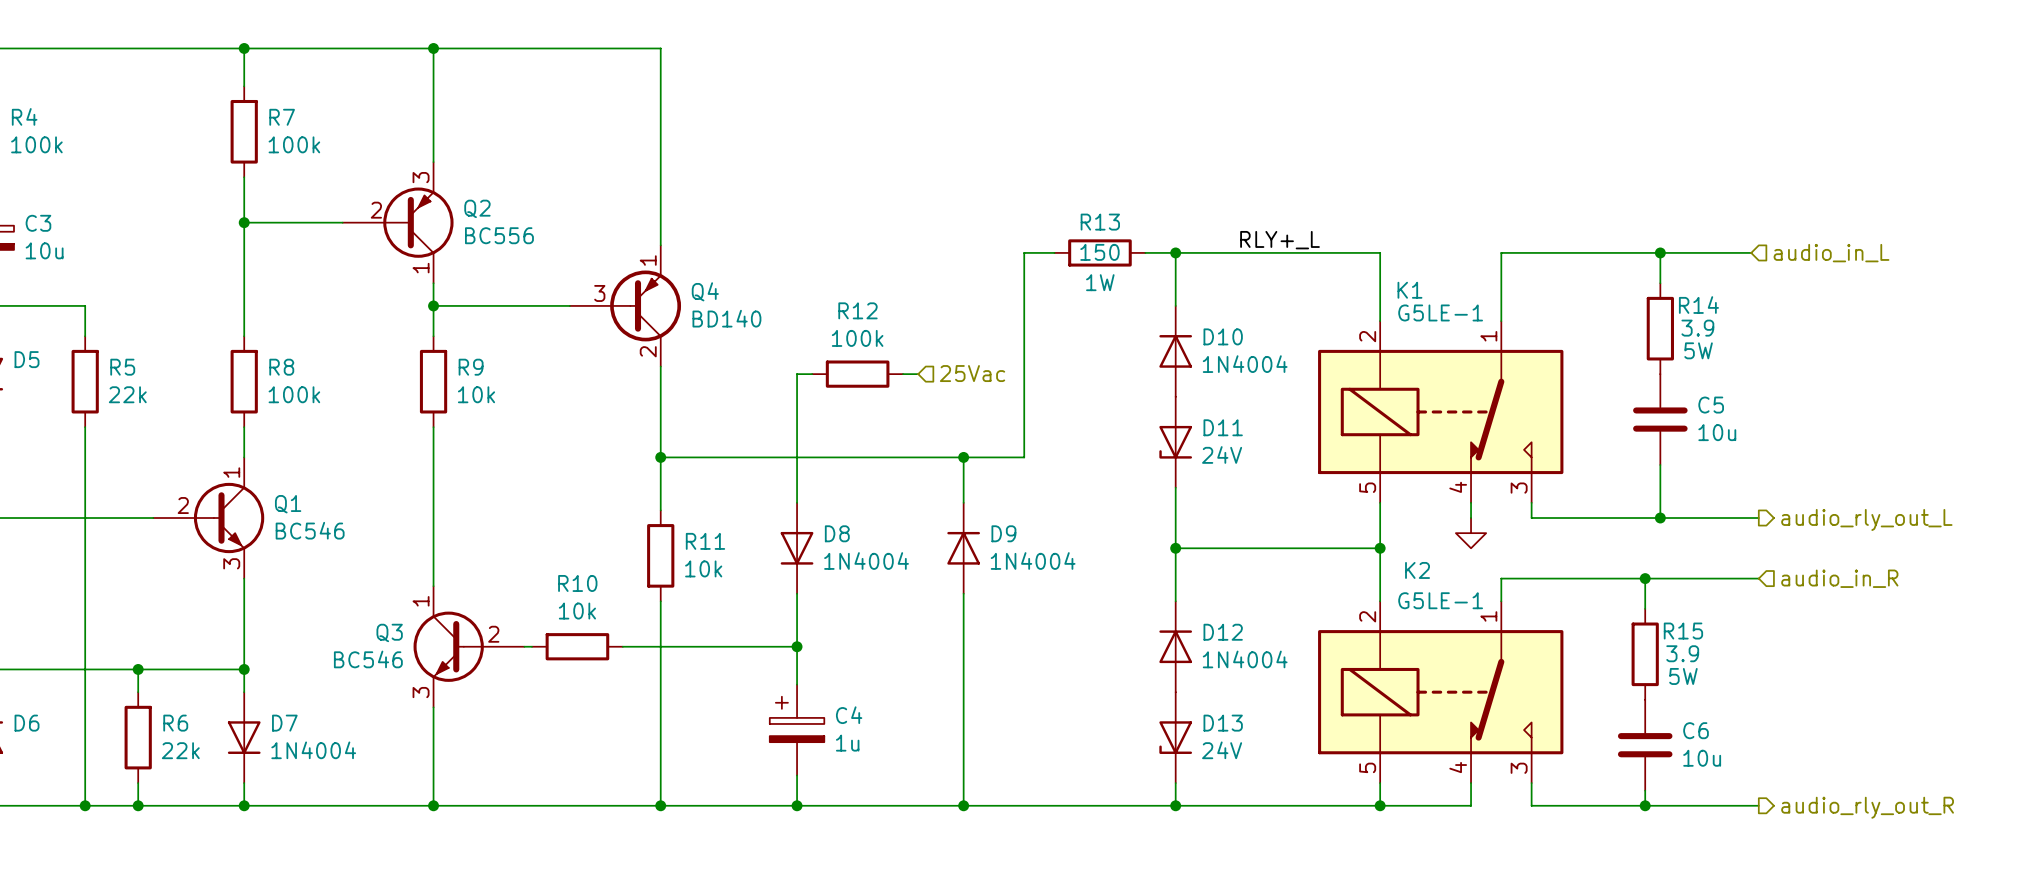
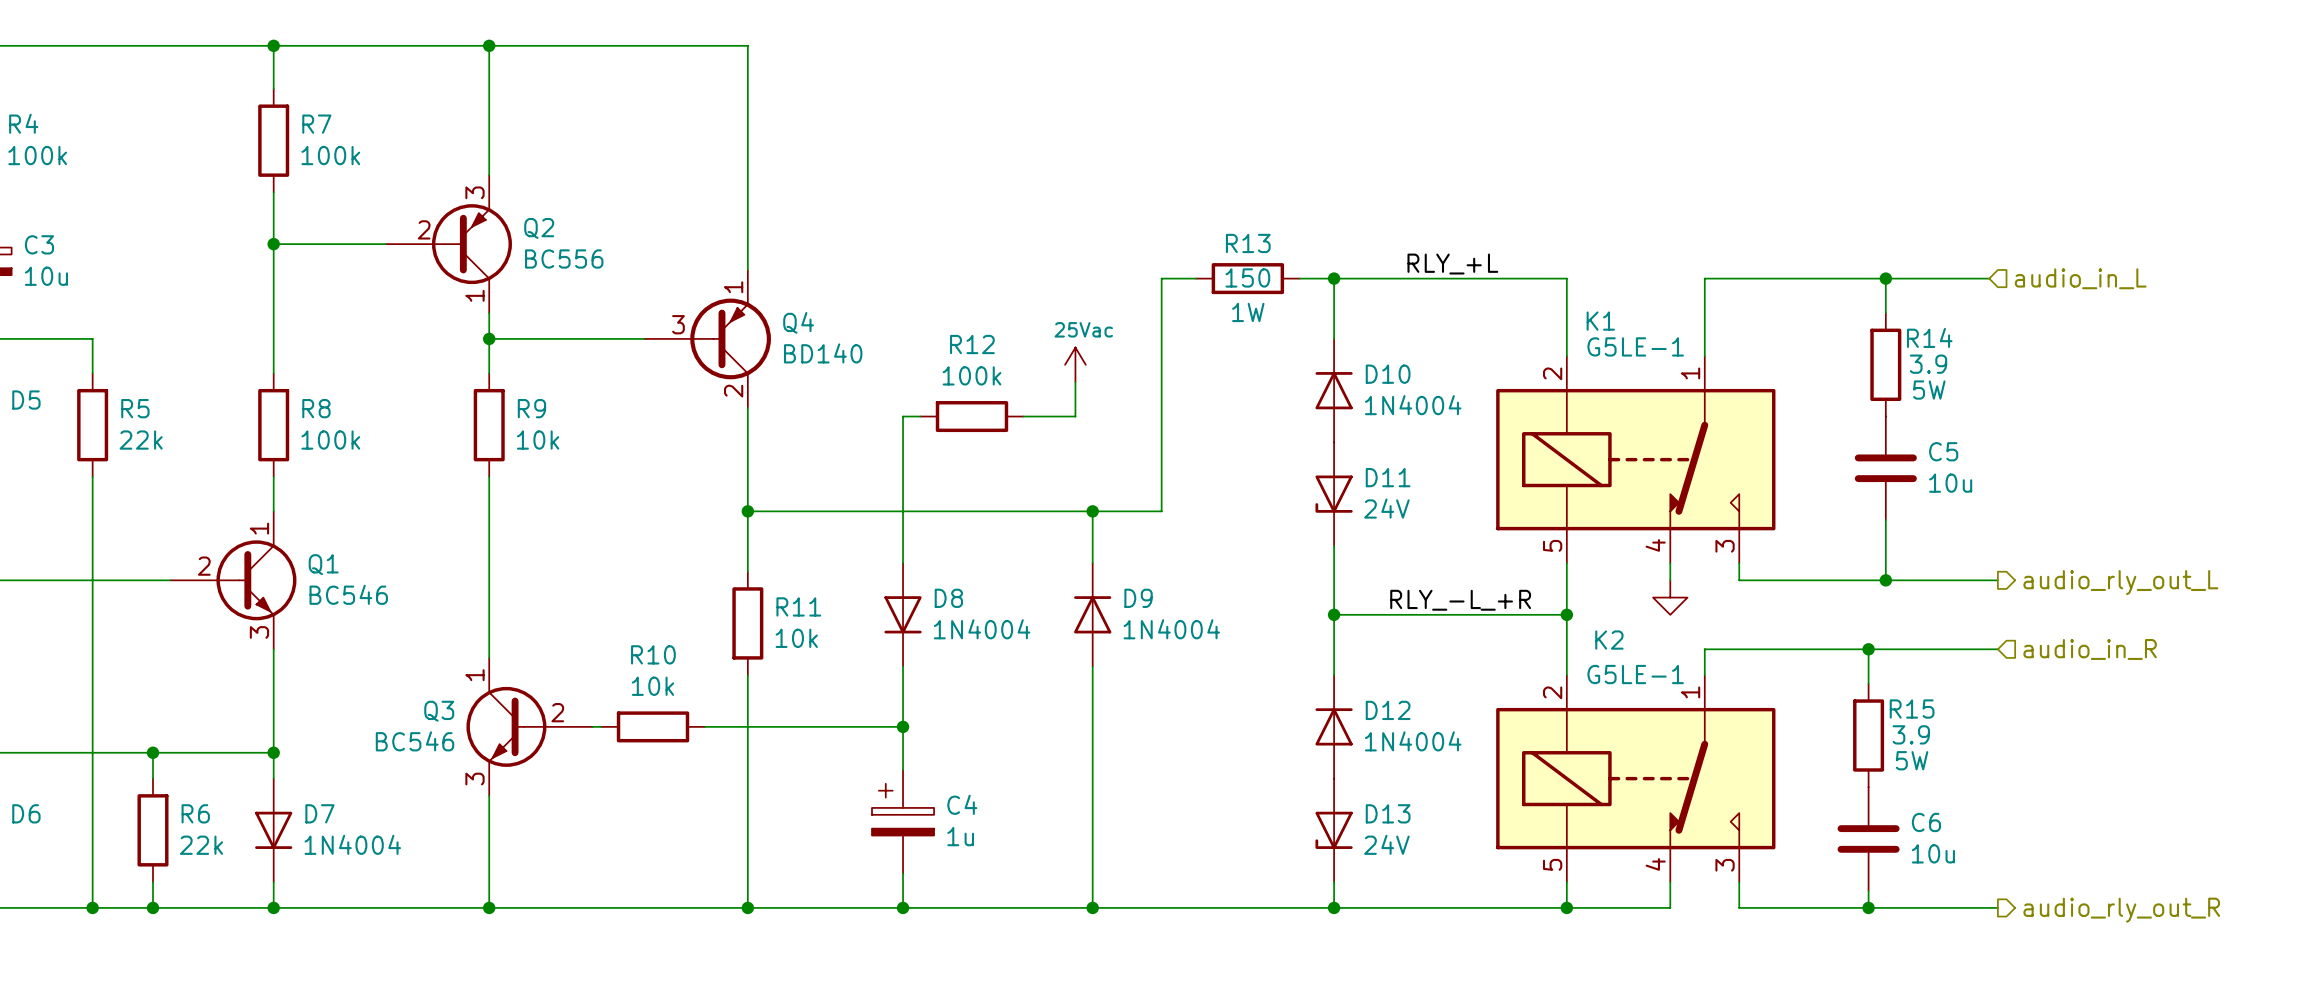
label: RLY+_L (1280, 240) -> RLY_+L (1452, 264)
power symbol: none -> 25Vac (1075, 364)
wire: none -> (1075, 382) (1075, 416) (1040, 416)
hierarchical label: 25Vac (972, 373) -> none
label: none -> RLY_-L_+R (1460, 600)

